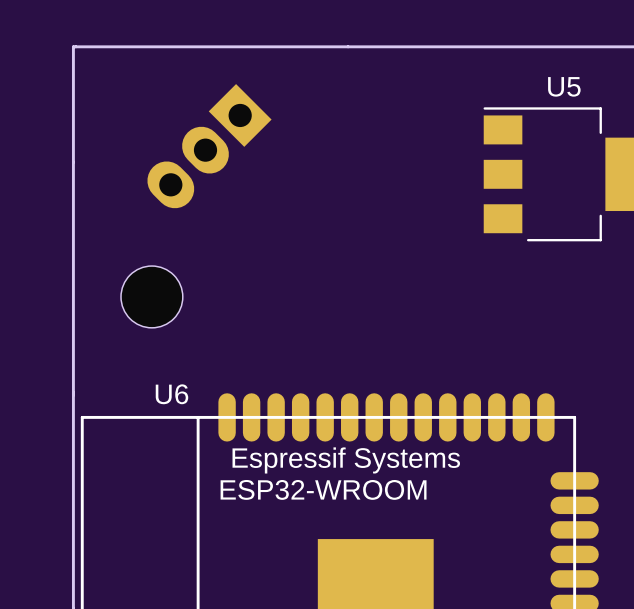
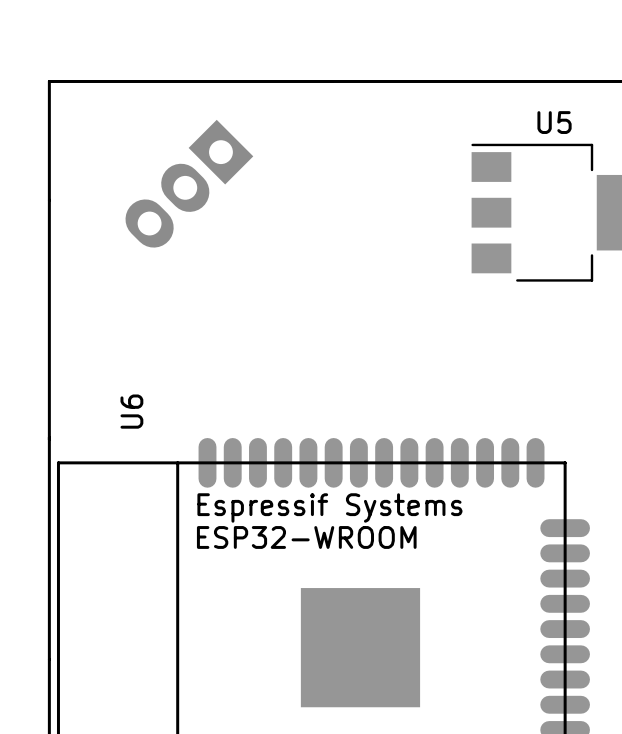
part: (151, 296) -> none
U6 name rotation: 0° (171, 394) -> 90° counterclockwise (131, 411)

